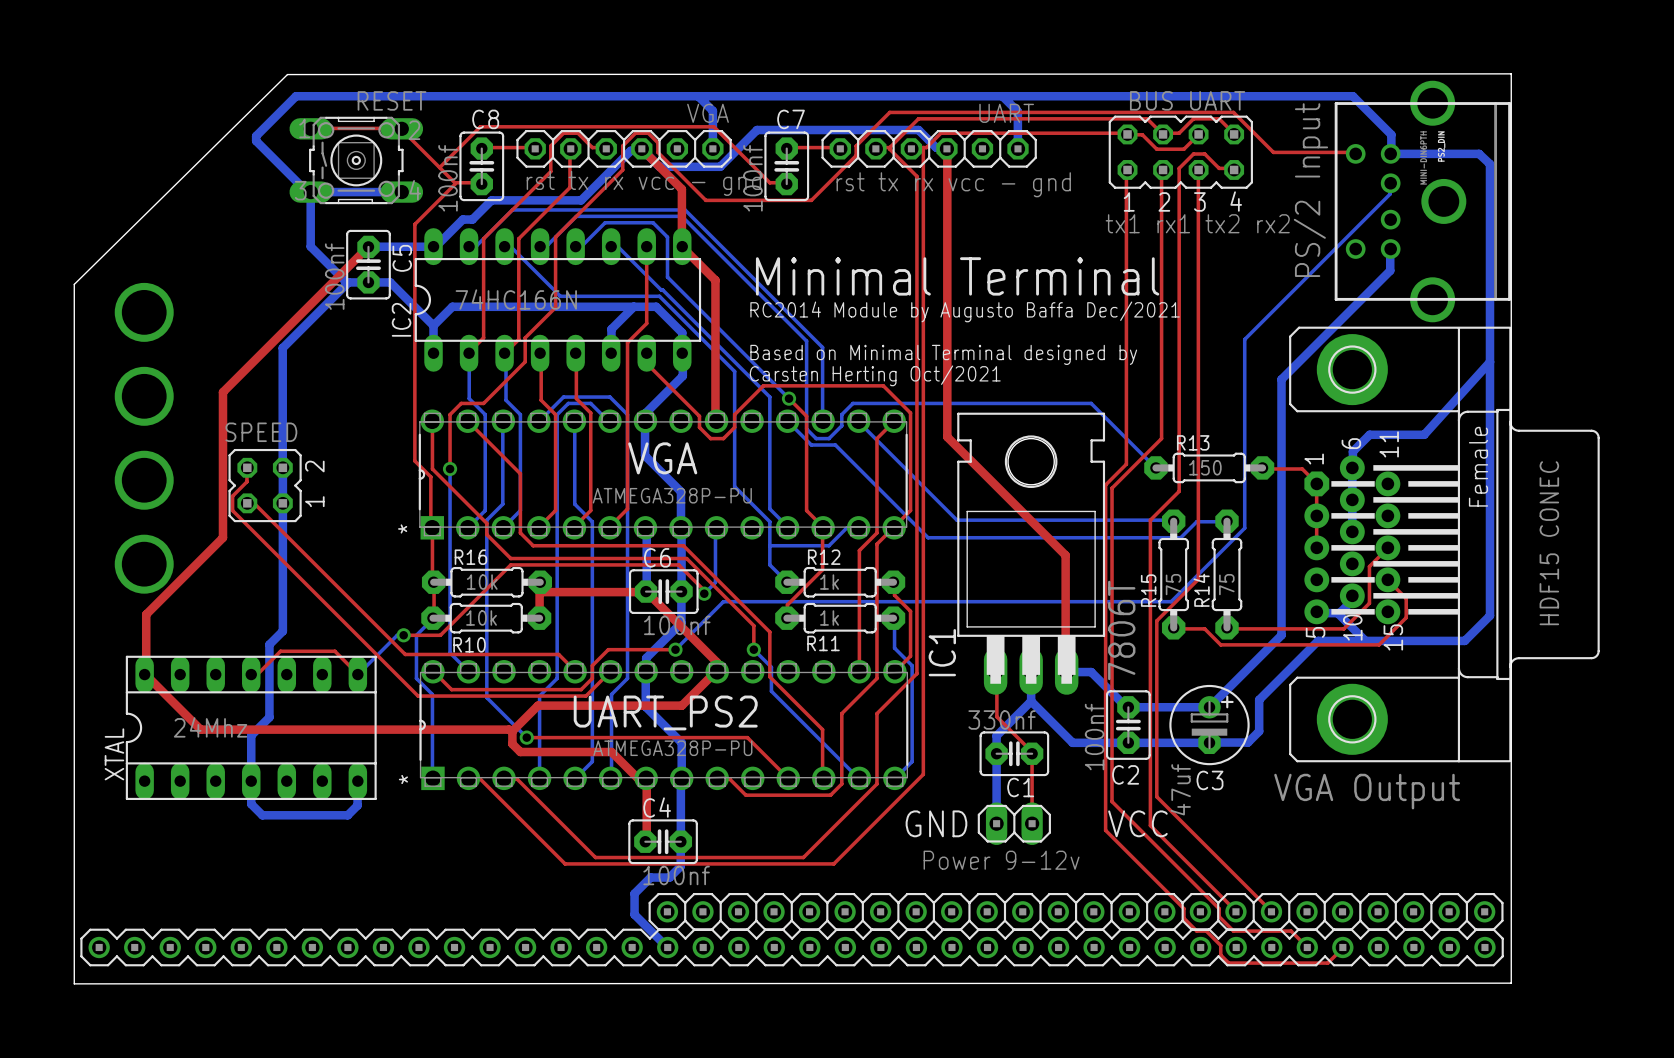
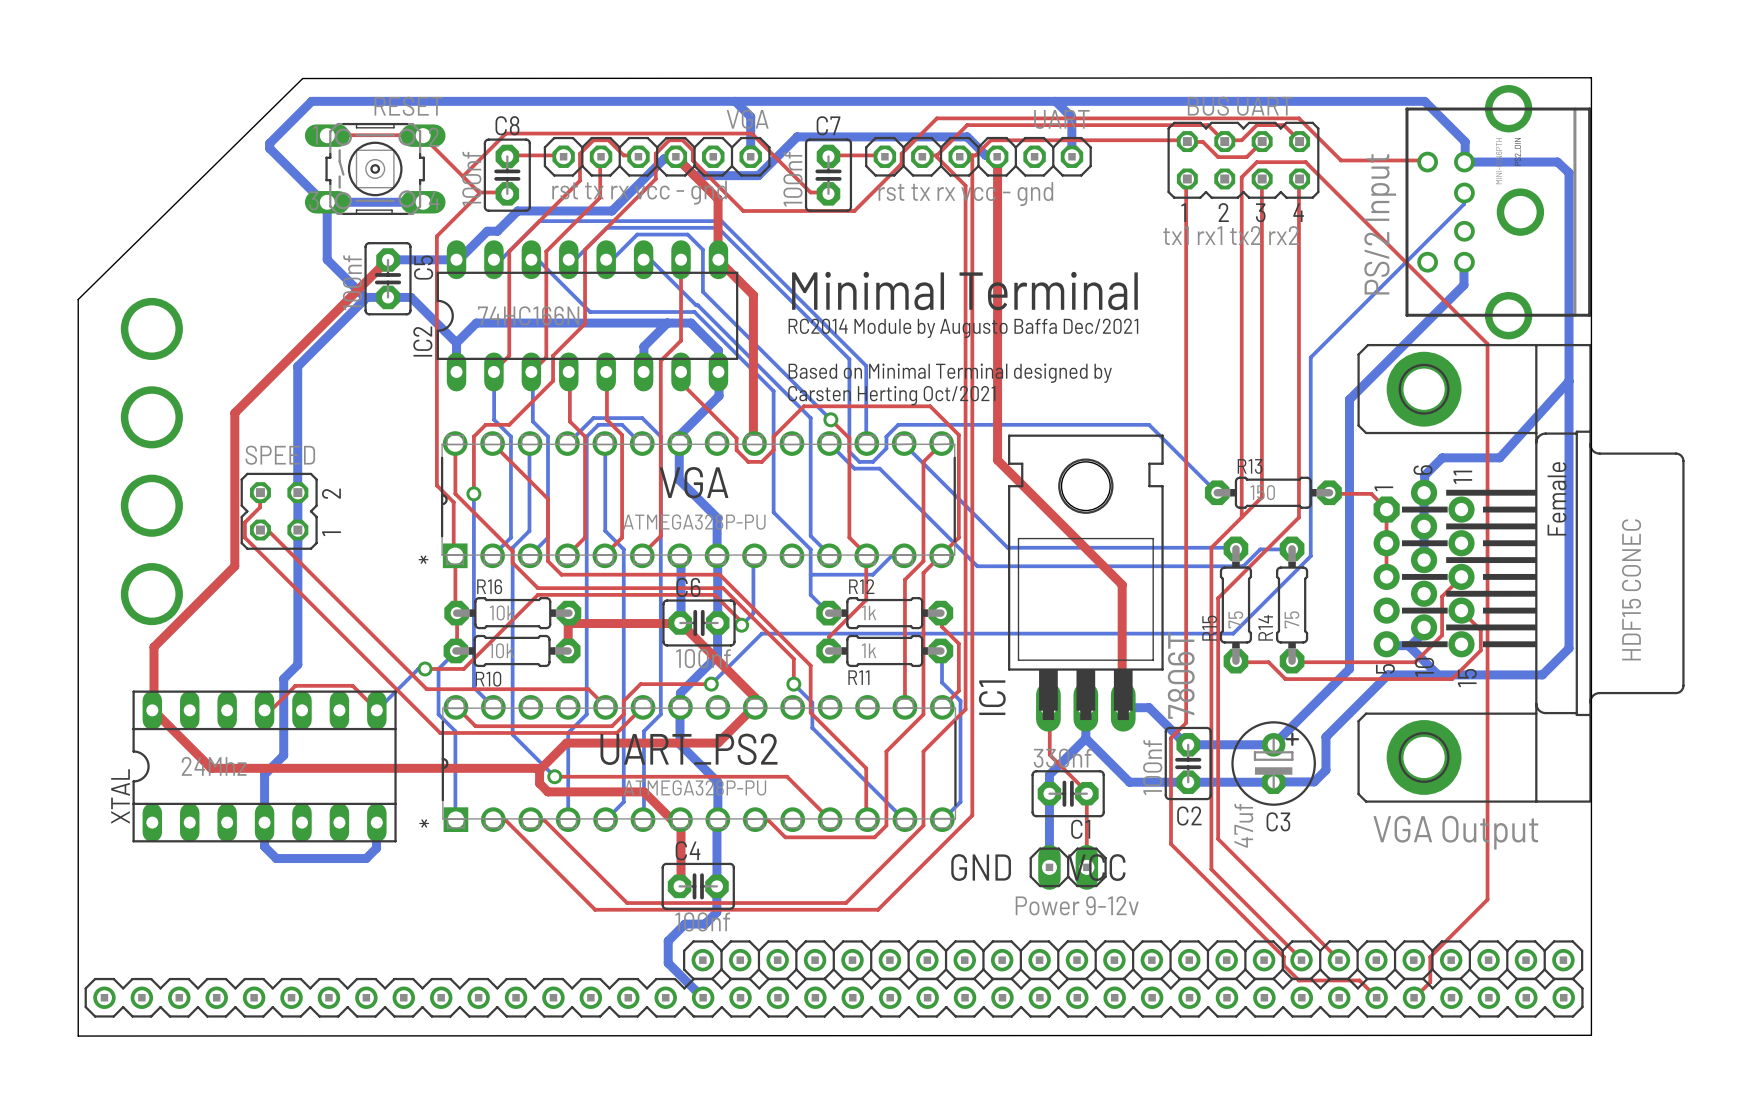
top track: (1204, 153) (1219, 168) (1233, 168) (1234, 169) -> (1218, 653) (1218, 598) (1298, 517) (1299, 178)
top track: (1163, 169) (1161, 438) (1112, 488) (1112, 700) -> (1186, 488) (1186, 722) (1170, 738)
top track: (1126, 464) (1105, 484) (1105, 830) (1183, 908) (1183, 918) (1196, 931) (1206, 931) (1220, 945) (1220, 955) (1228, 963) (1327, 963) (1342, 947) -> (1268, 162) (1305, 162) (1487, 344) (1487, 899) (1430, 956) (1430, 982) (1414, 997)
top track: (1198, 472) (1198, 579) (1156, 620) -> (1261, 497) (1241, 517)

